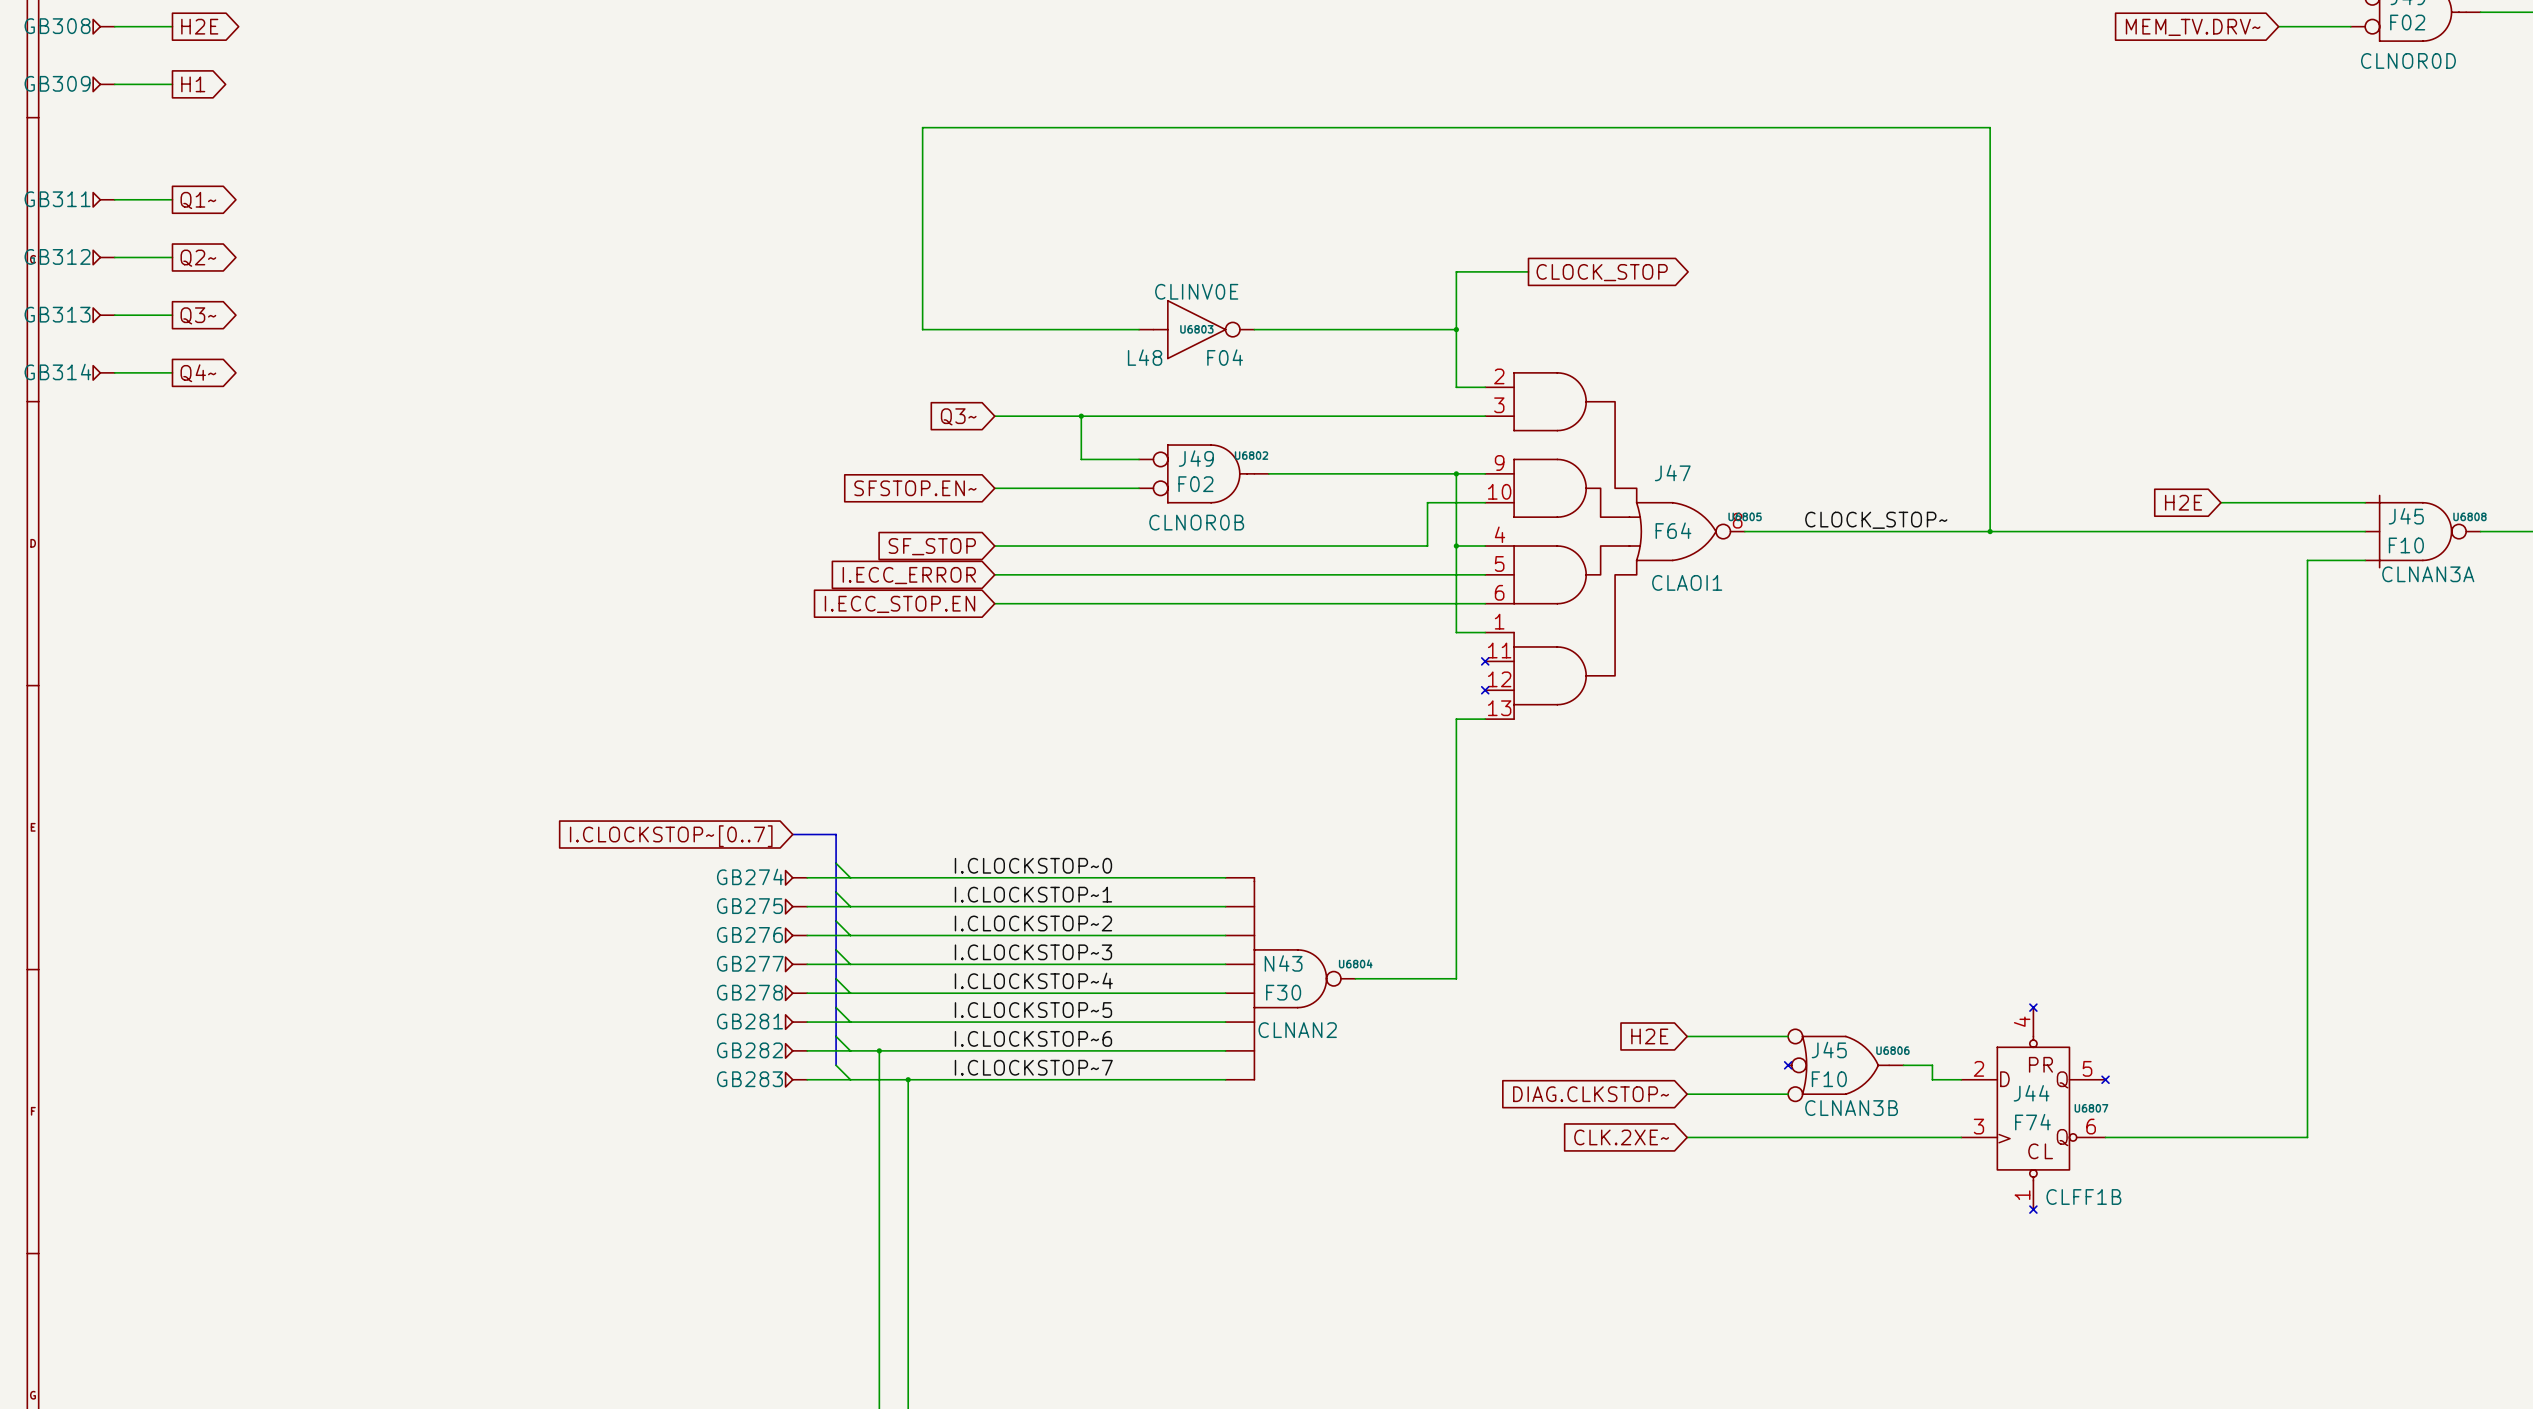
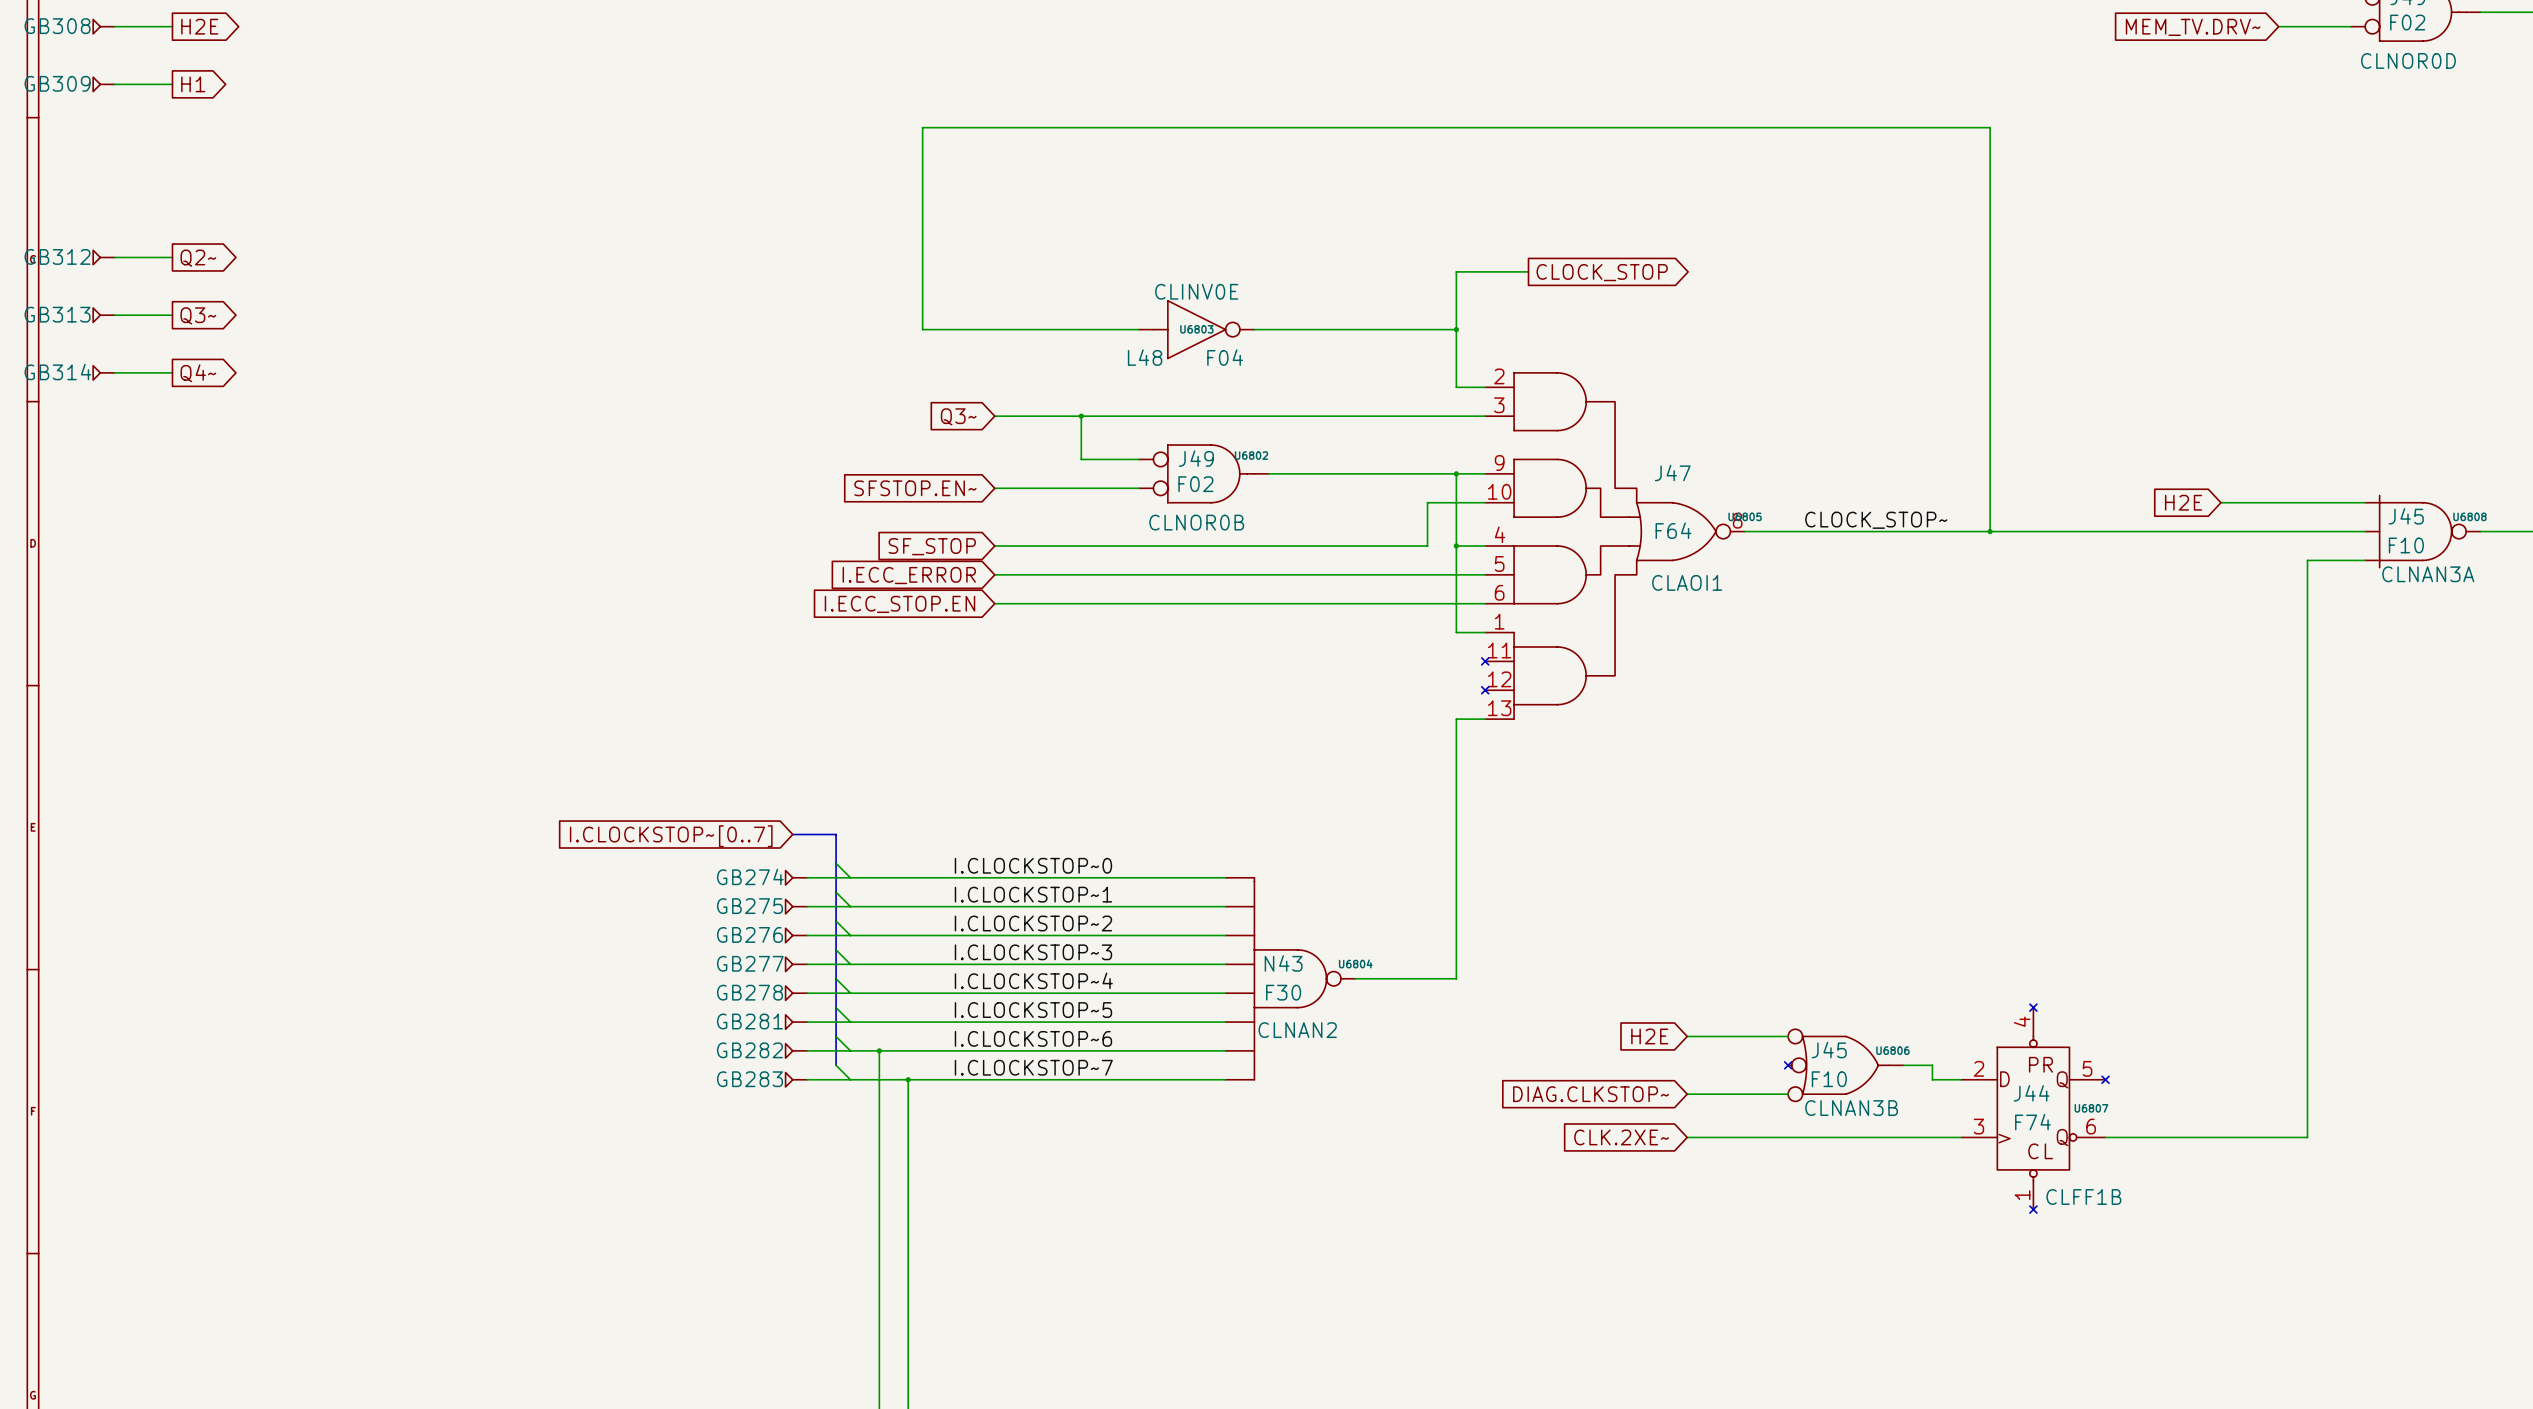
GB311: (103, 199) -> none
wire: (114, 199) (172, 199) -> none
global label: Q1~ (198, 200) -> none

